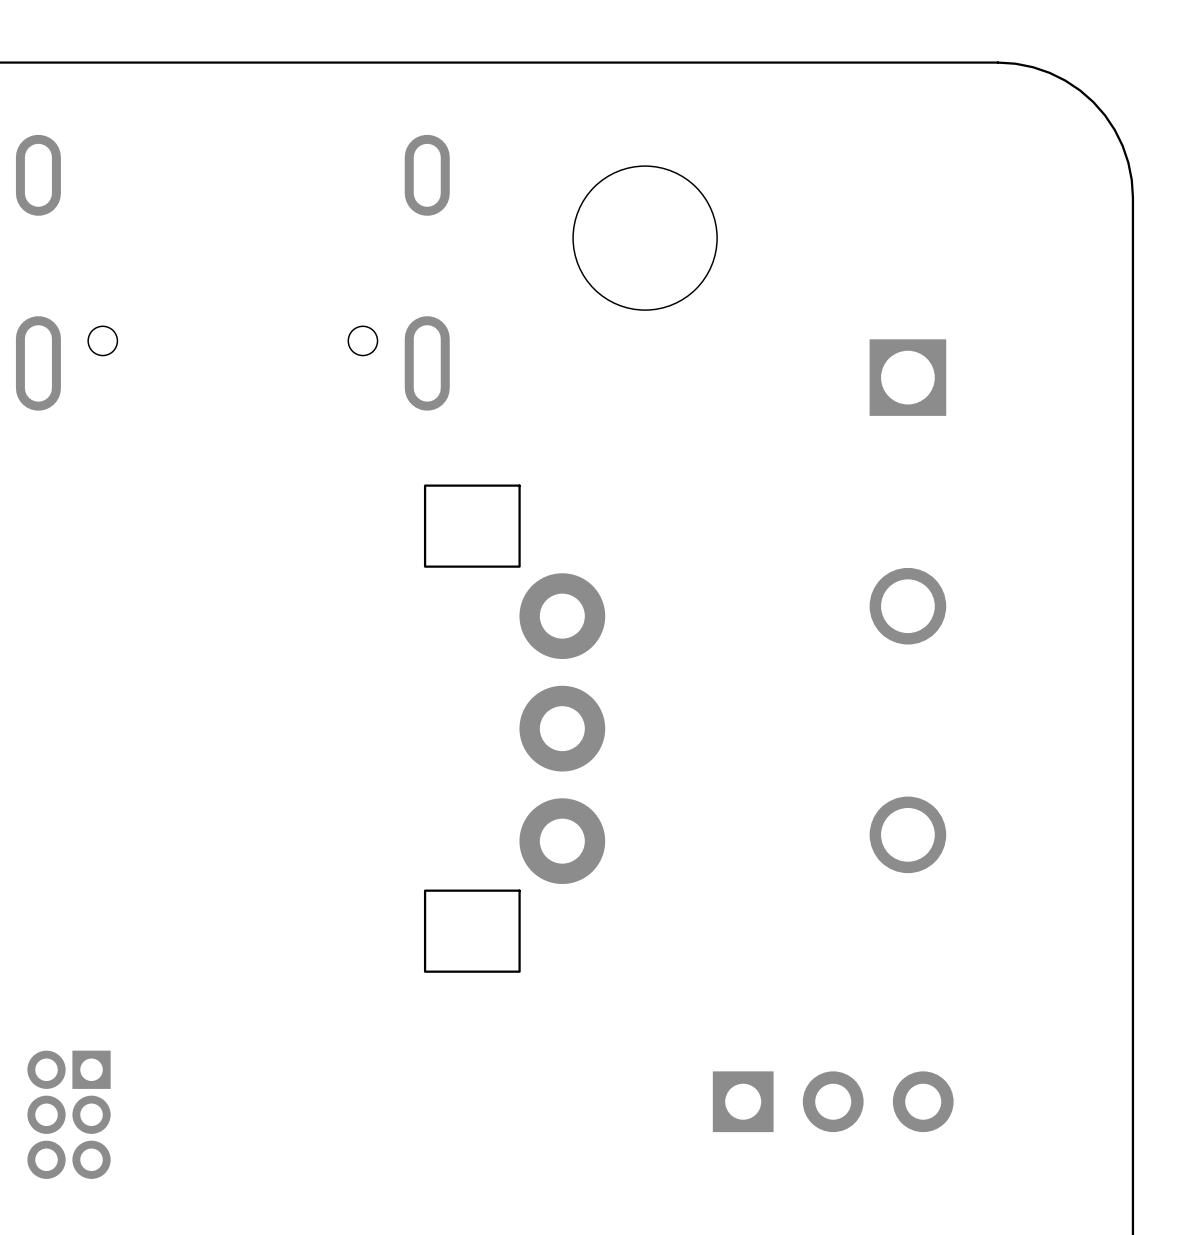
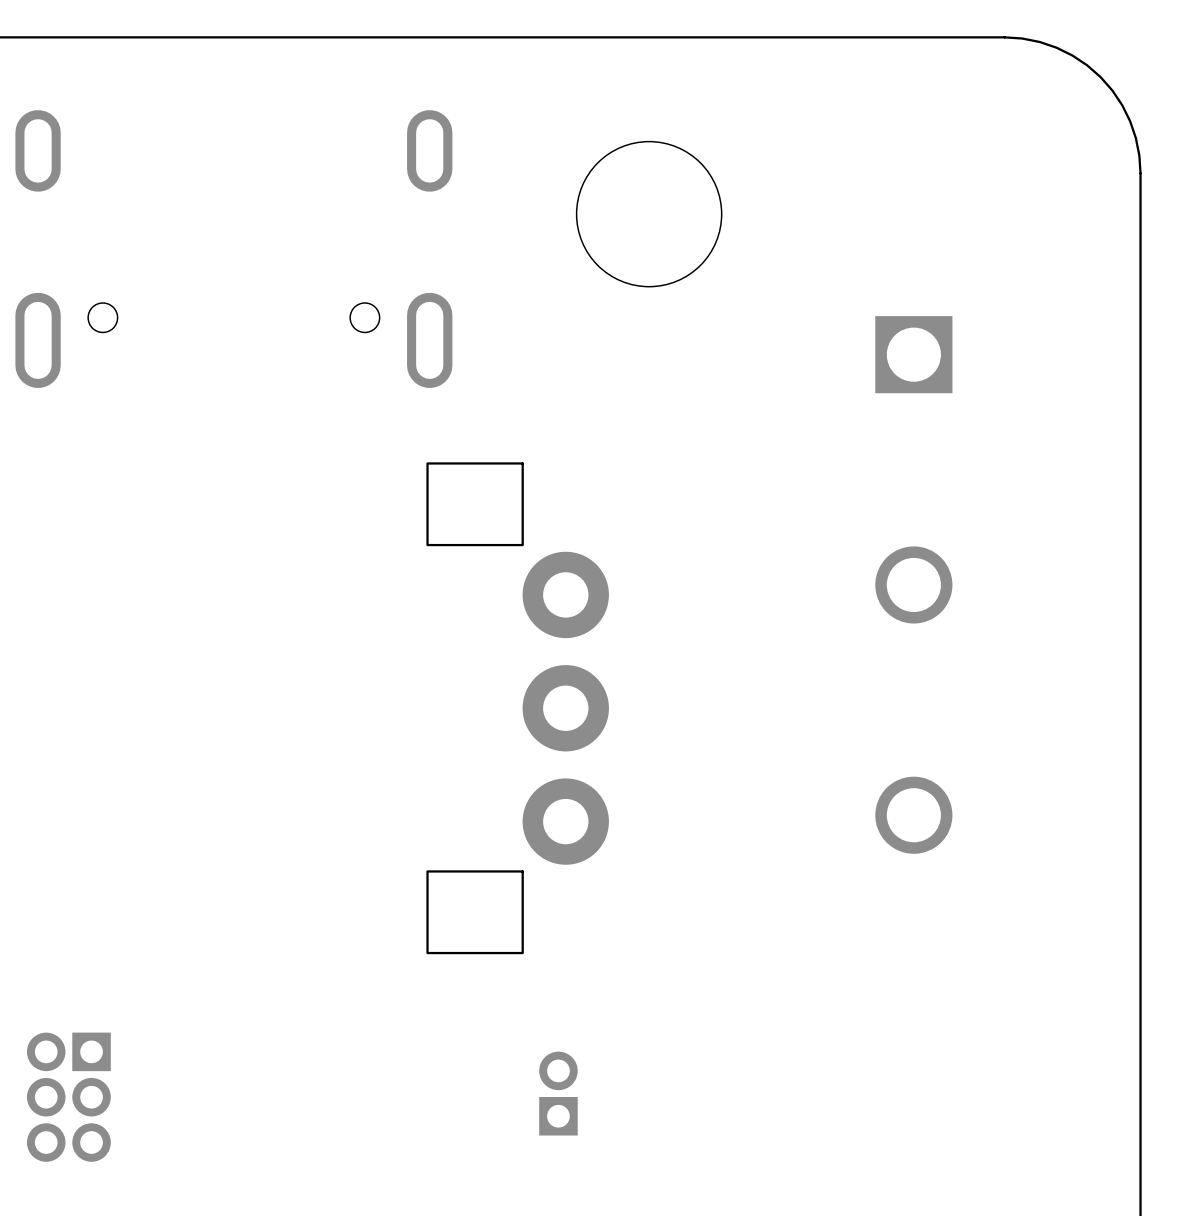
part: (833, 1101) -> none
part: none -> (558, 1093)

